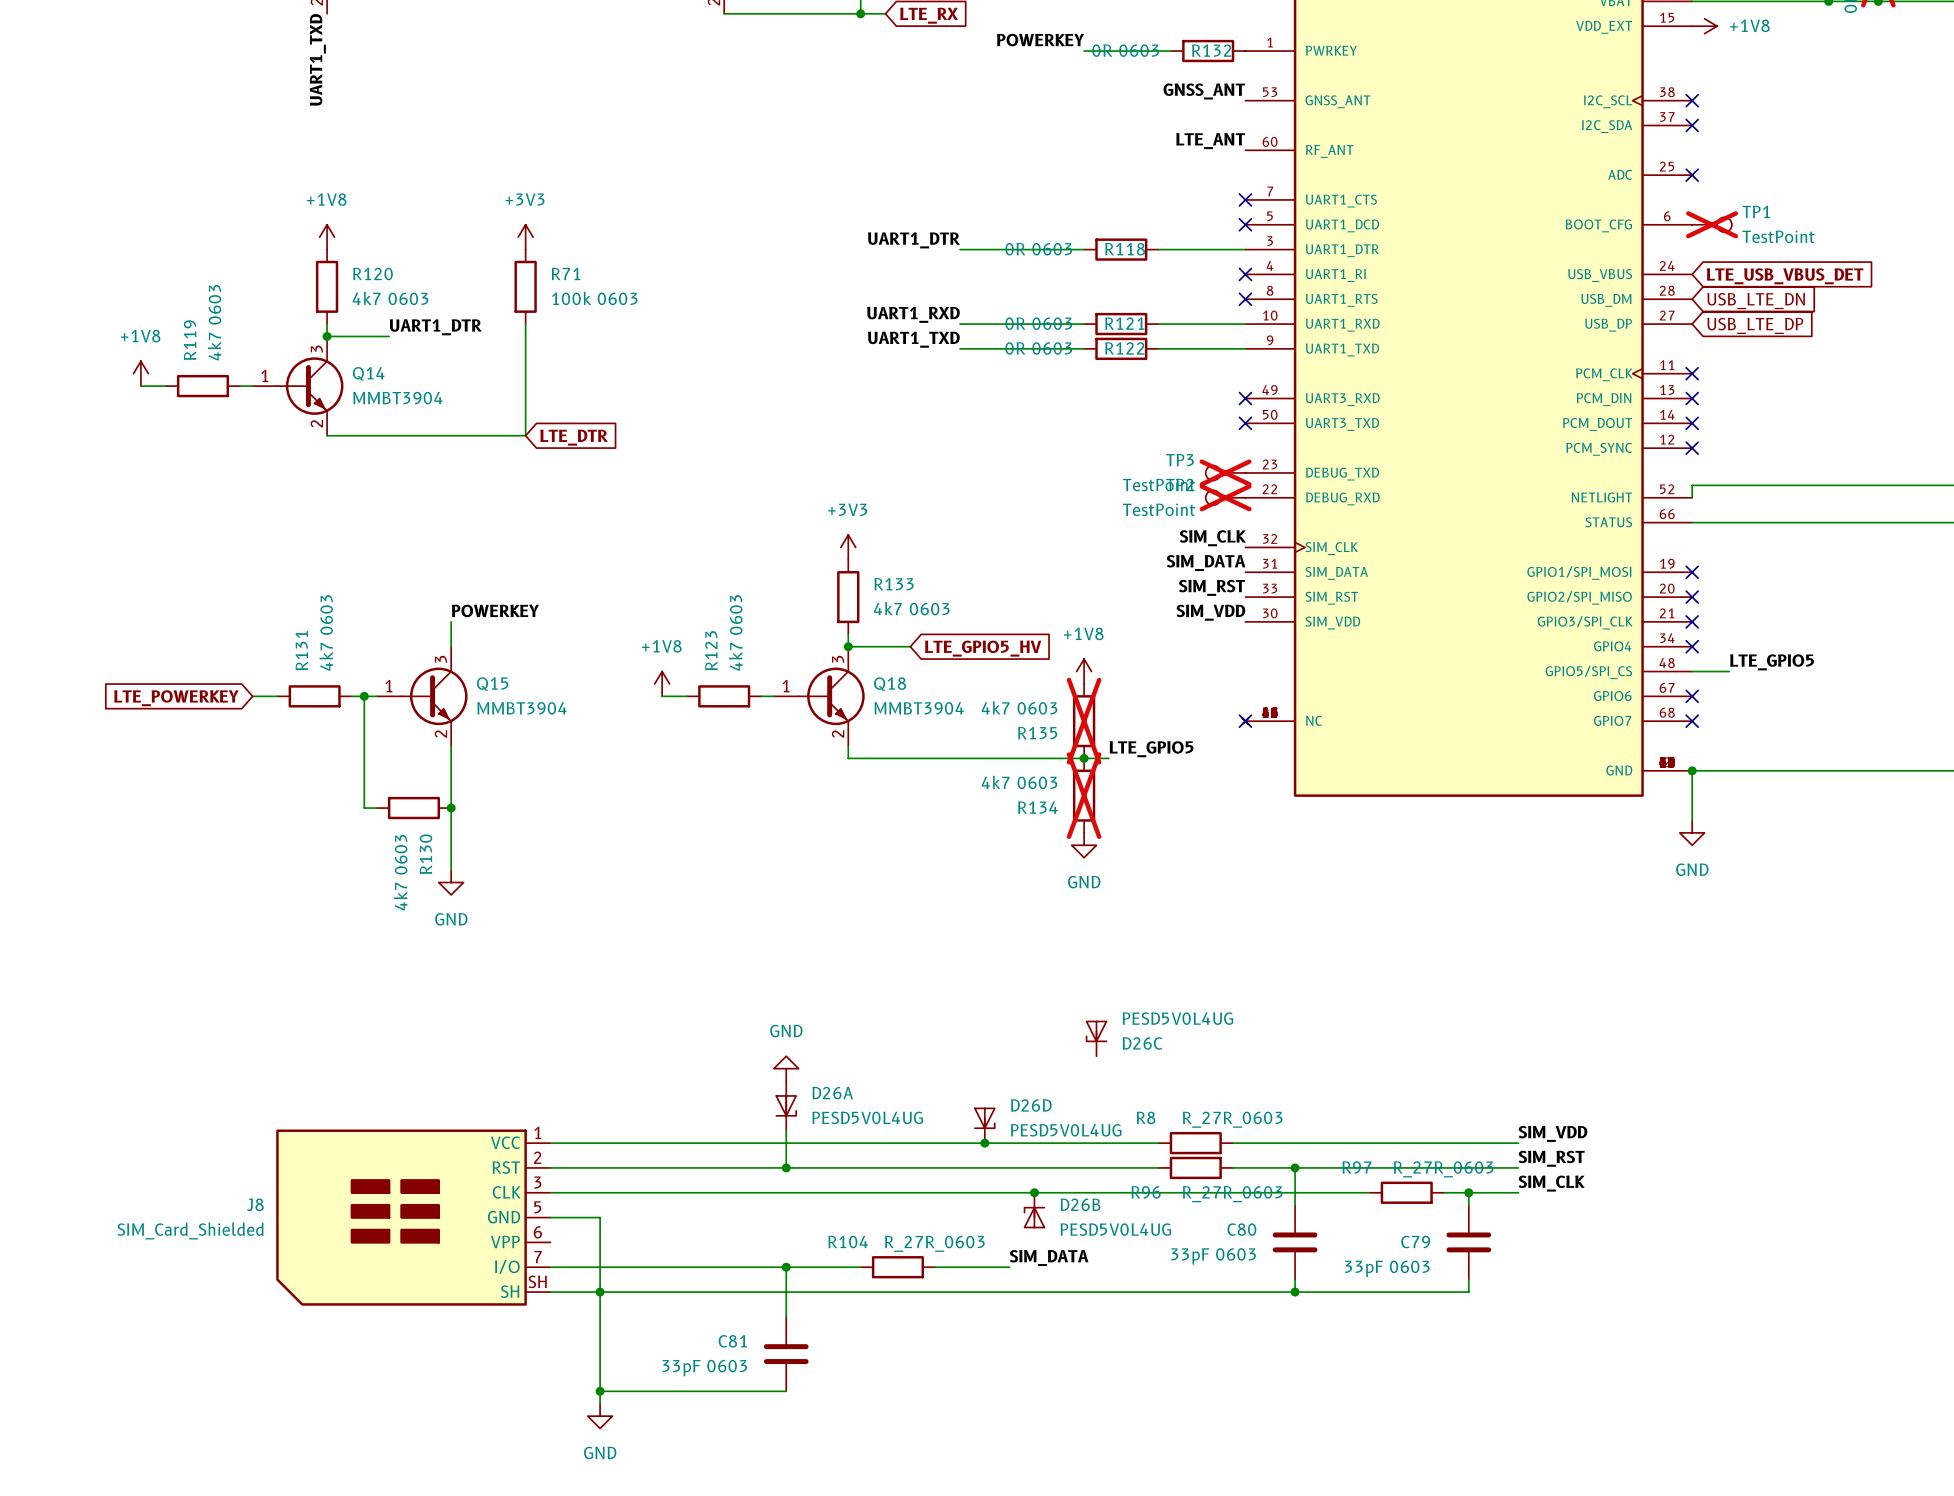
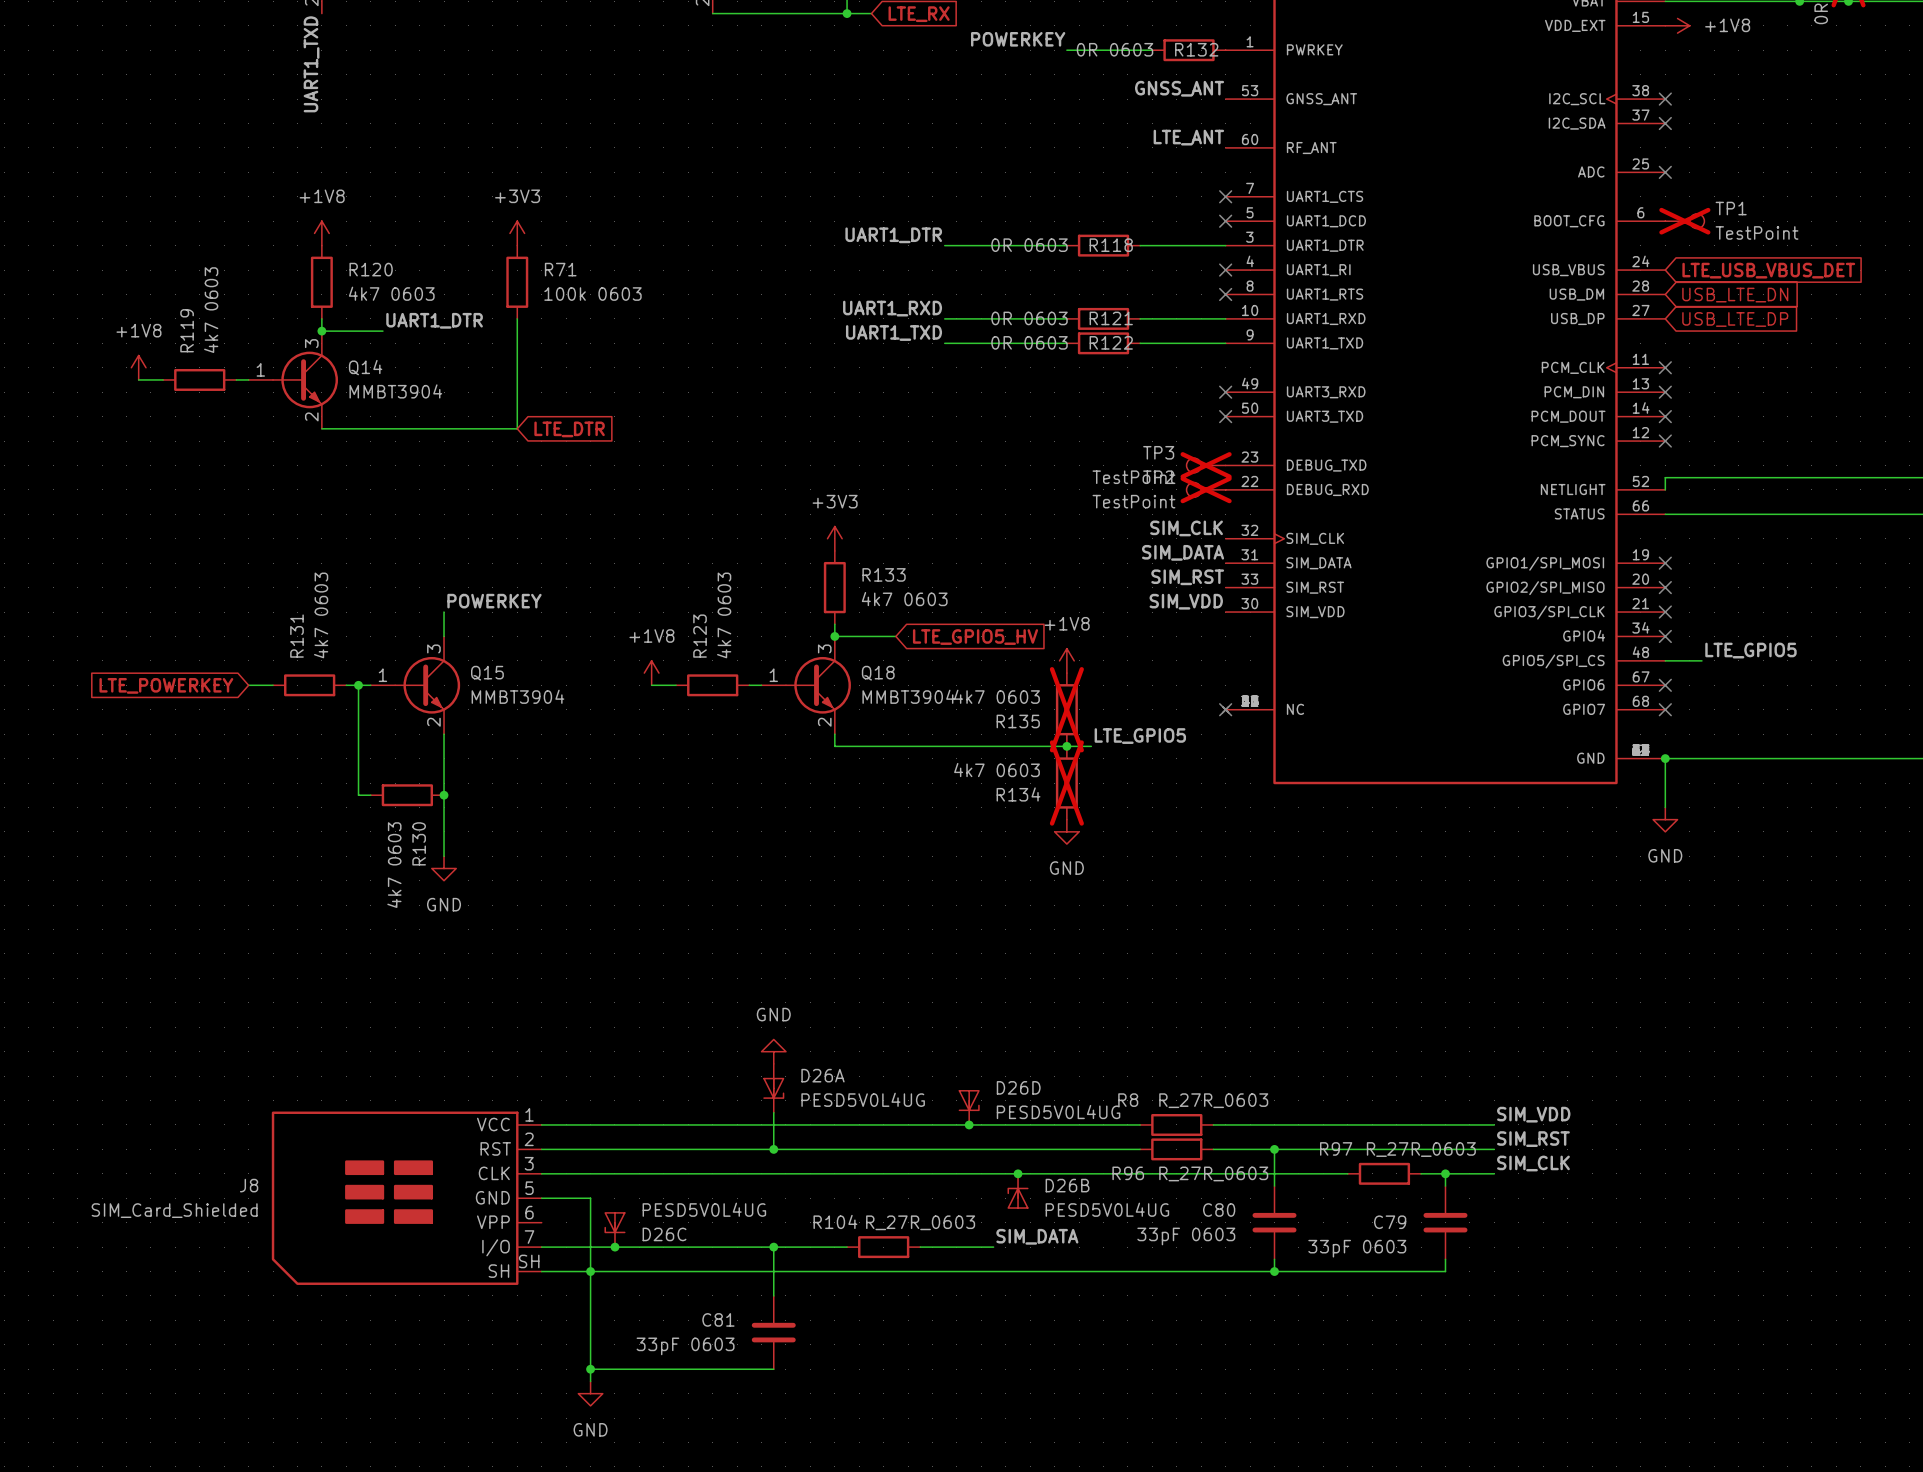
D26C position: (1096, 1038) -> (614, 1230)
junction: none -> (614, 1247)

